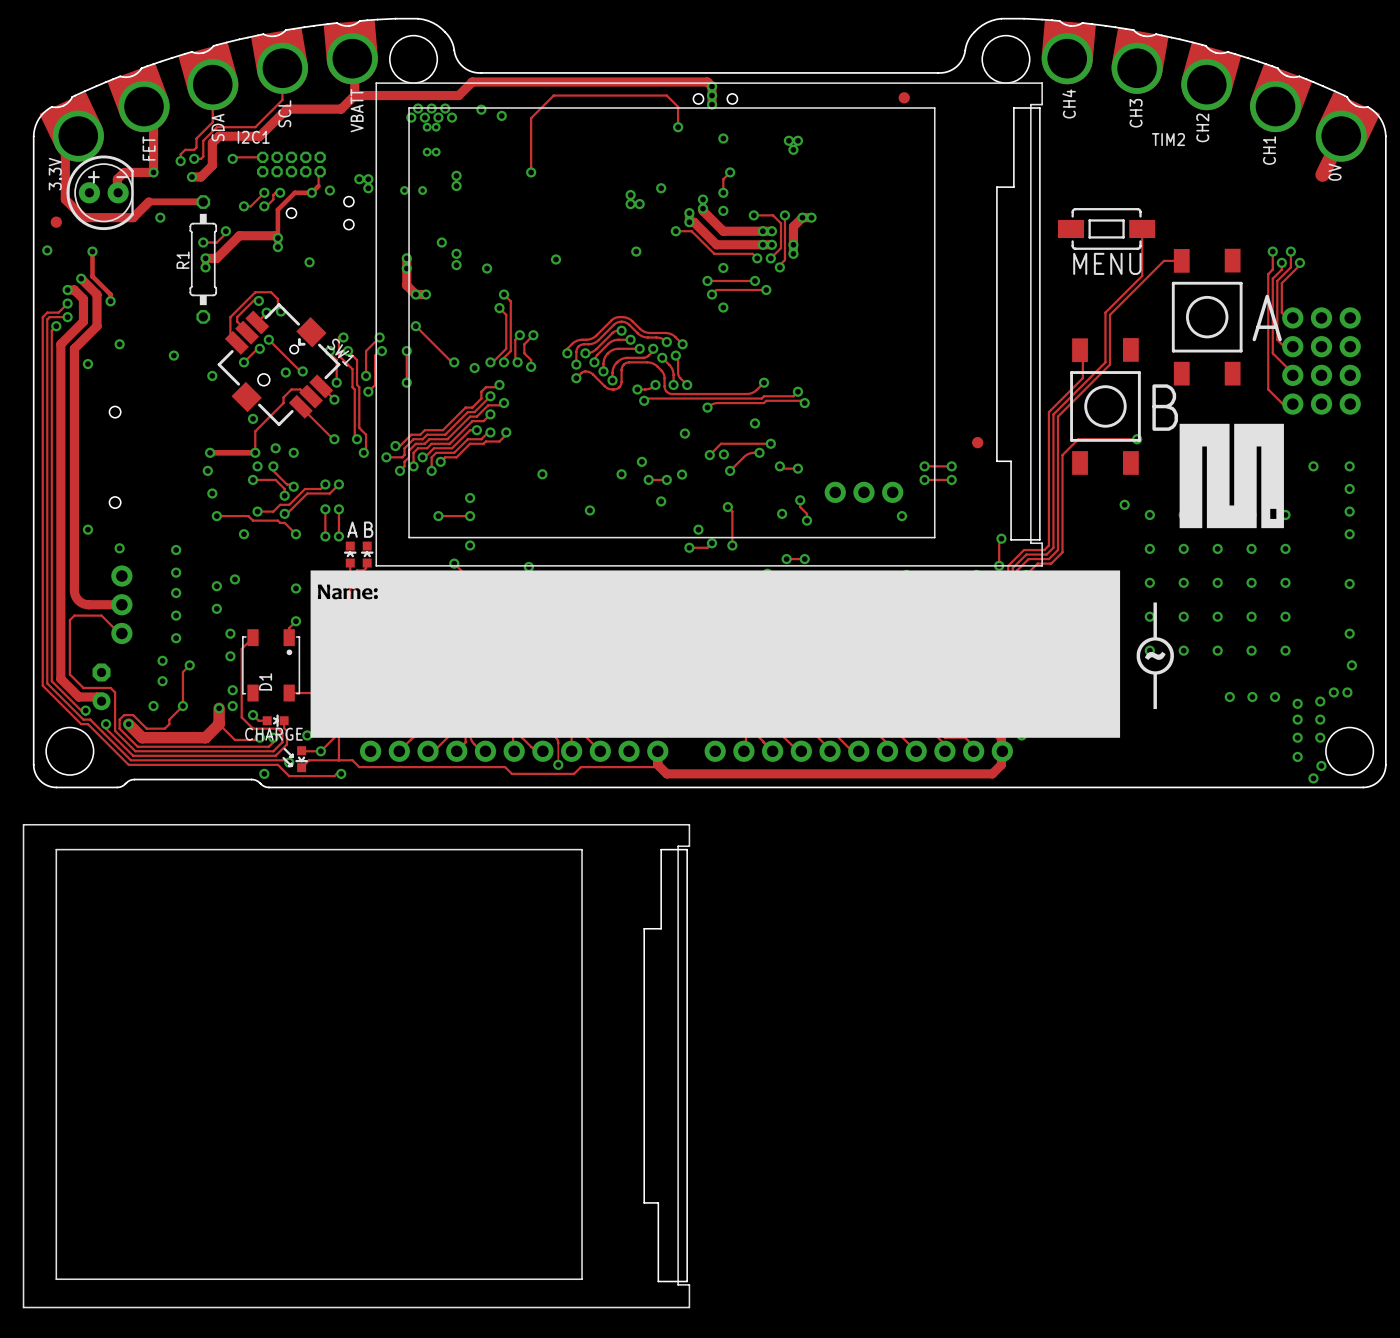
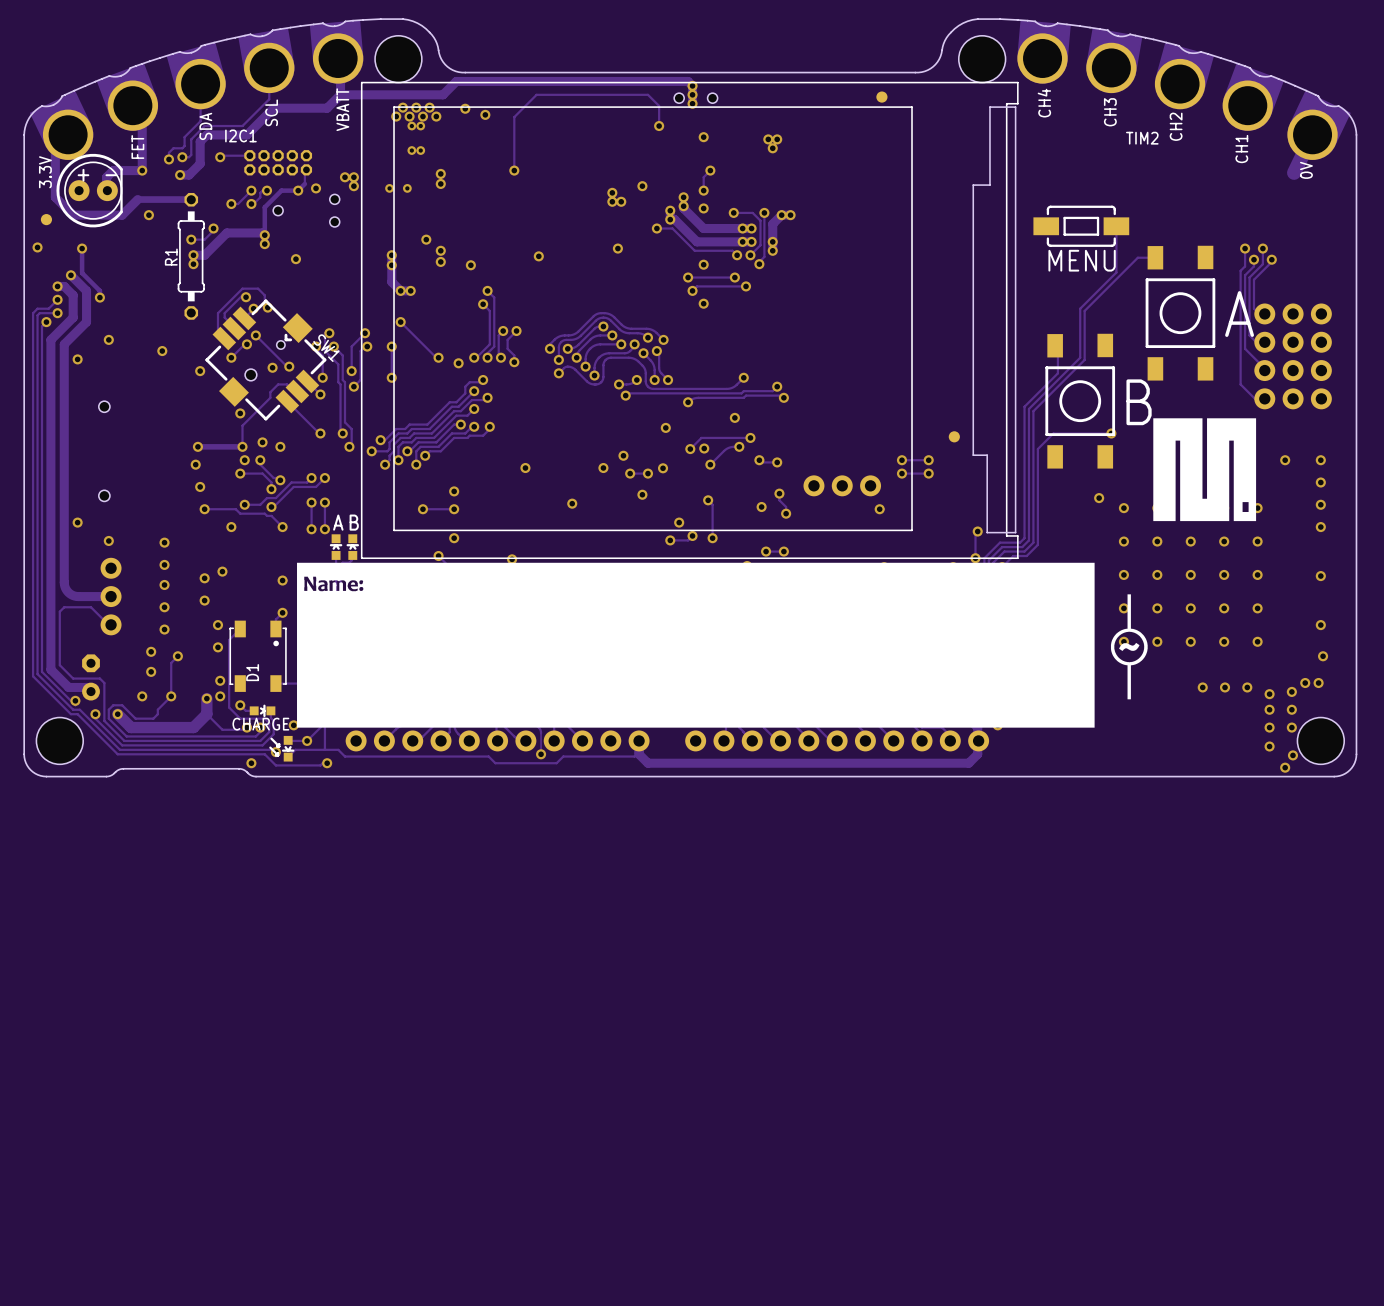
drawing: [22, 824, 691, 1309] -> none

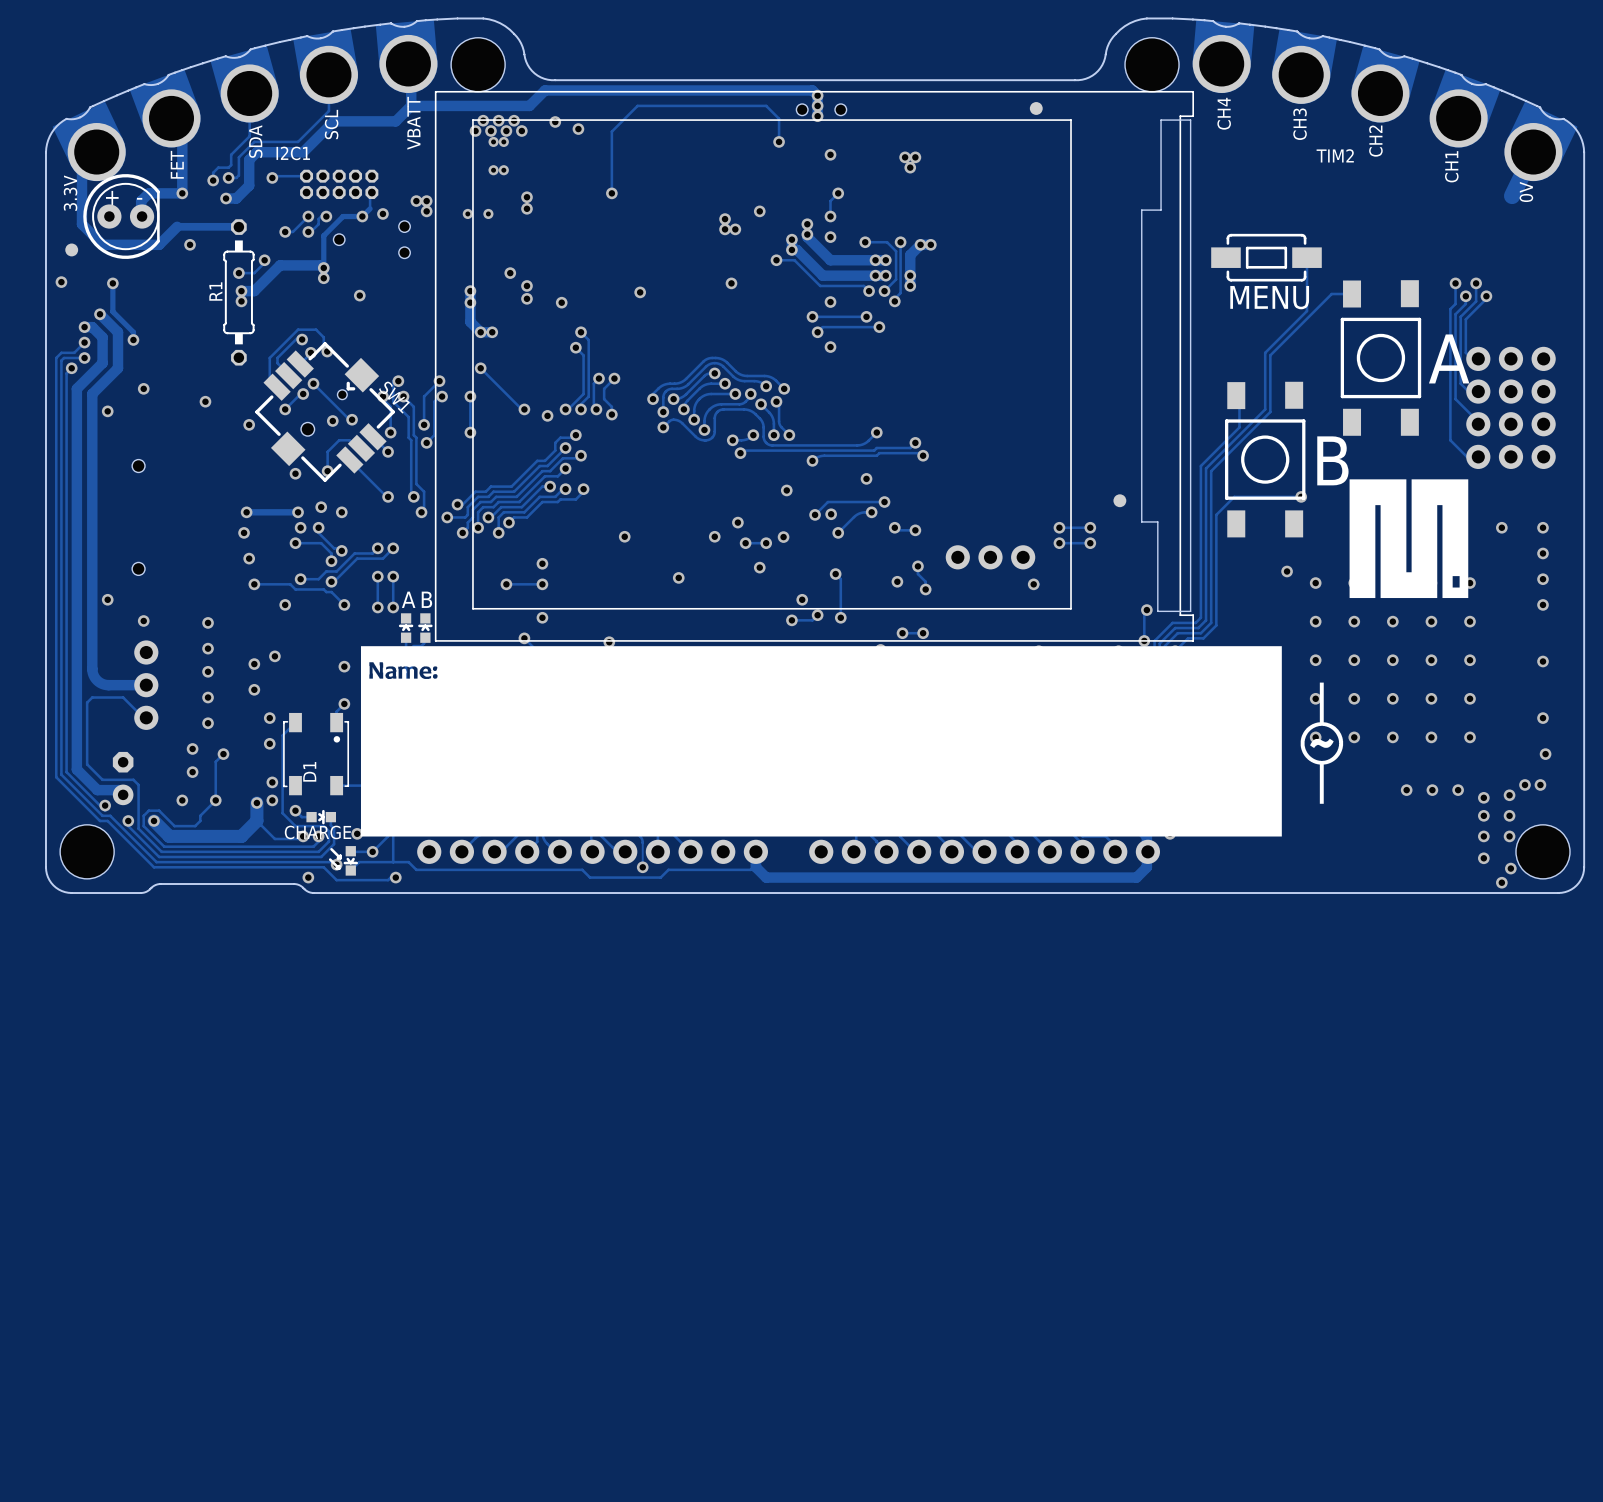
track: (270, 392) (270, 397) (242, 425) (242, 446) -> (330, 449) (327, 451) (327, 471)
via: none -> (327, 471)

